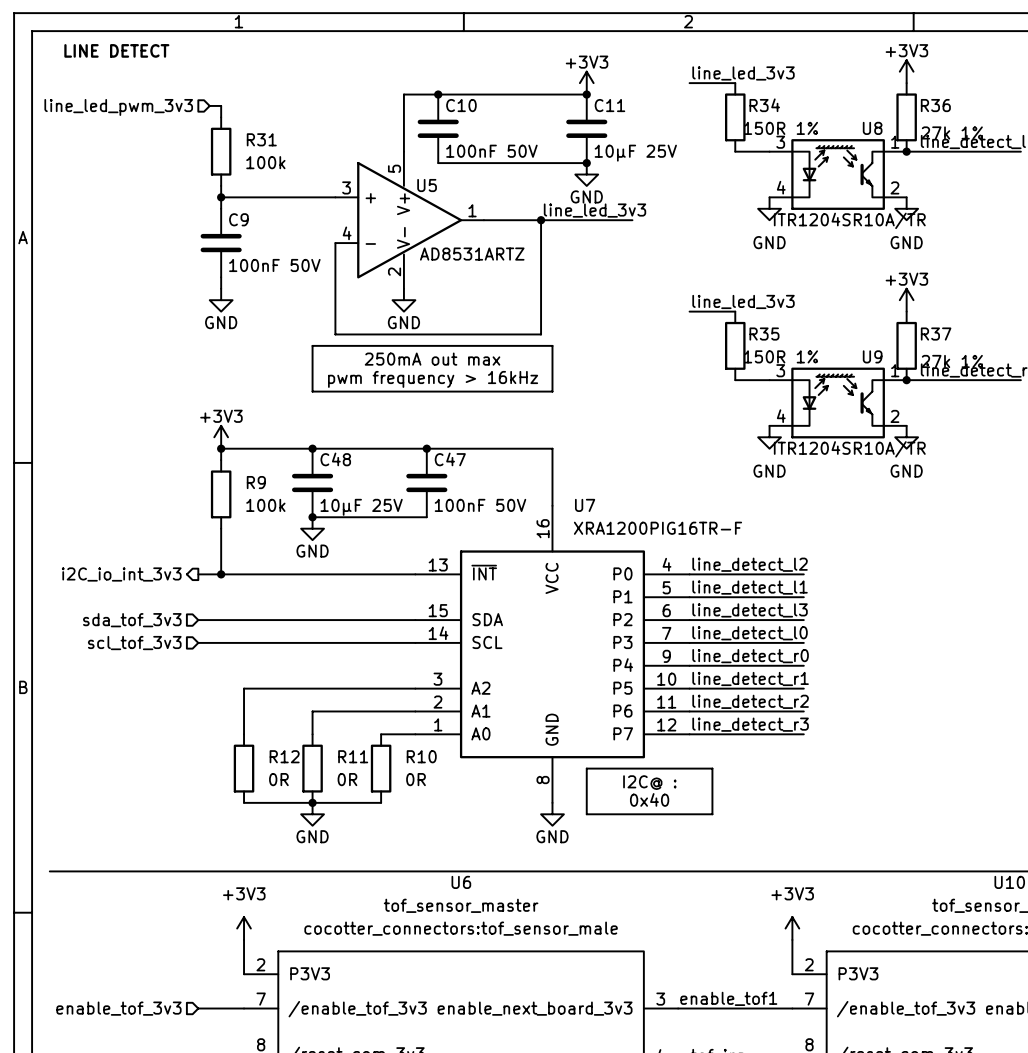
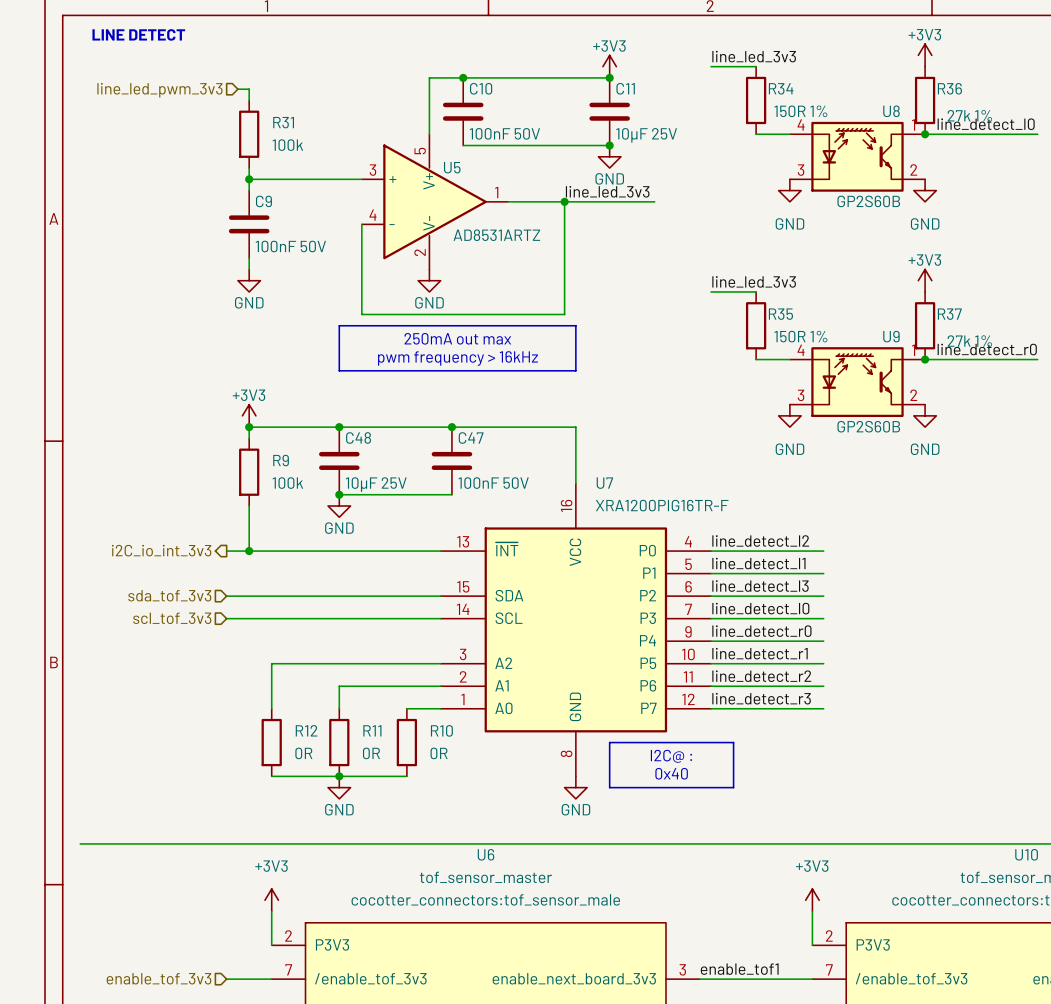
U8 pin number: 3 (780, 142) -> 4 (801, 124)
U8 pin number: 4 (781, 187) -> 3 (801, 170)
U8 value: ITR1204SR10A/TR (849, 220) -> GP2S60B (868, 201)
U9 pin number: 3 (780, 370) -> 4 (801, 350)
U9 pin number: 4 (781, 416) -> 3 (801, 395)
U9 value: ITR1204SR10A/TR (849, 449) -> GP2S60B (868, 426)

